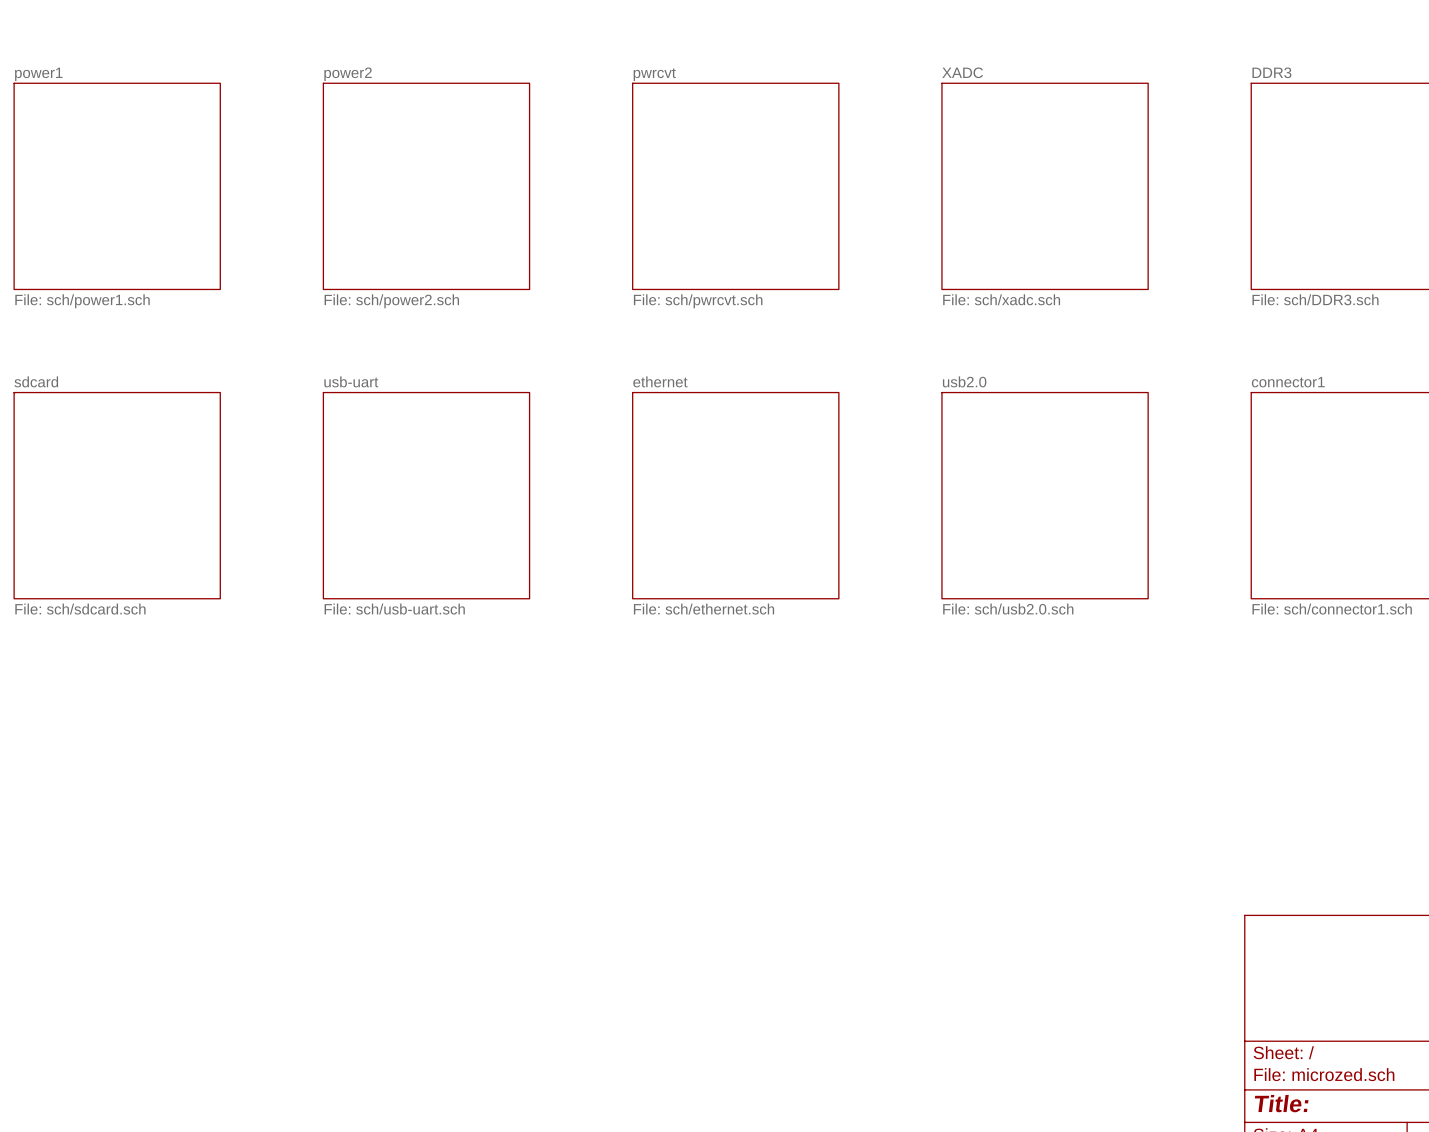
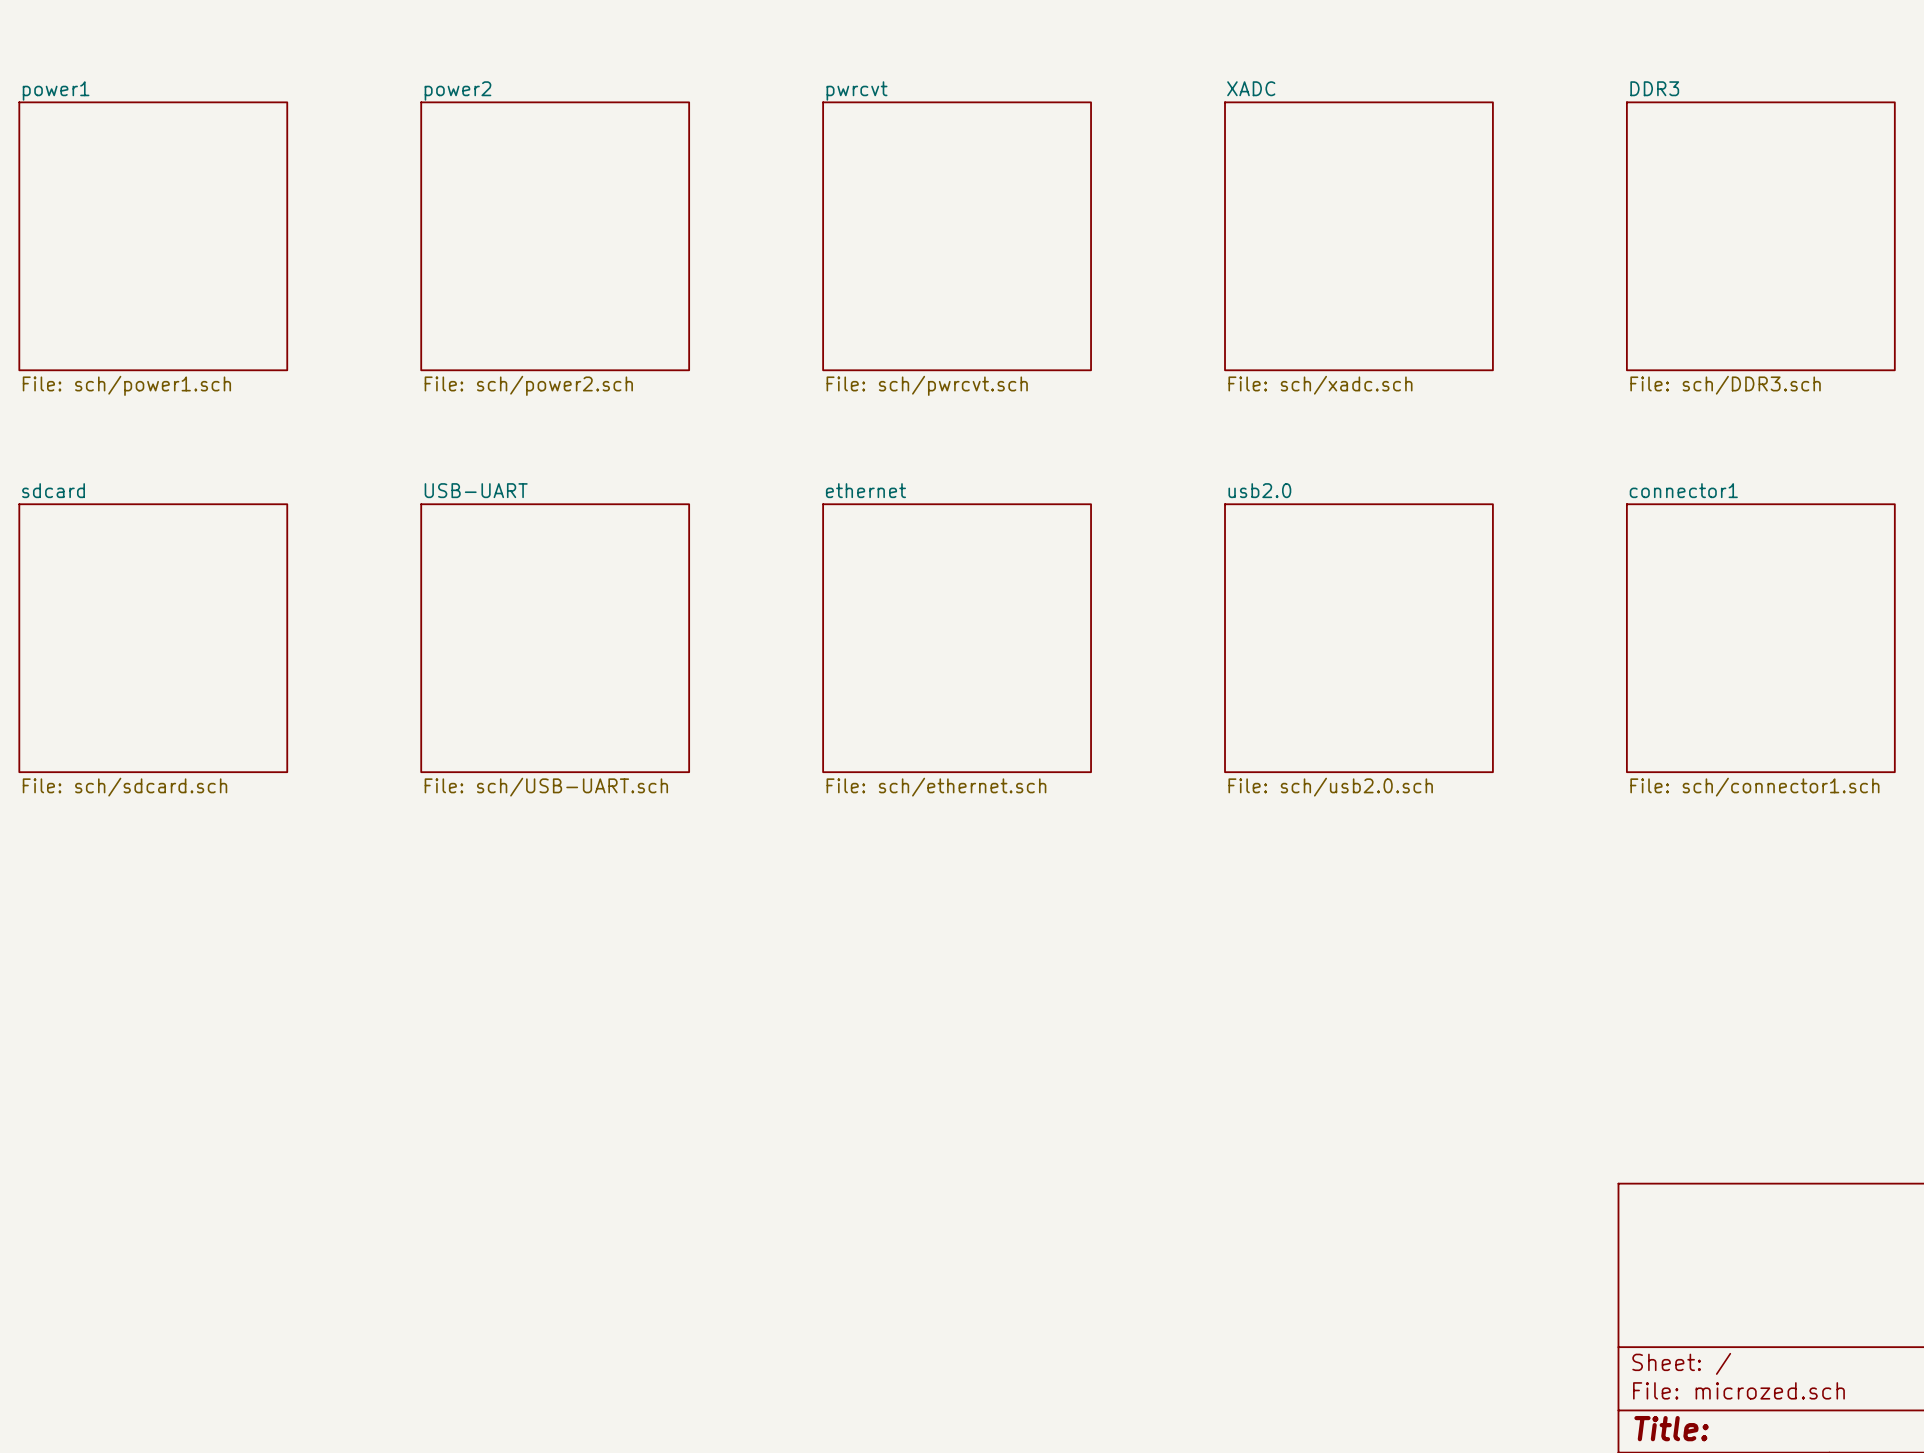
sheet usb-uart name: usb-uart (351, 381) -> USB-UART (476, 490)
sheet usb-uart value: File: sch/usb-uart.sch (394, 609) -> File: sch/USB-UART.sch (546, 787)

